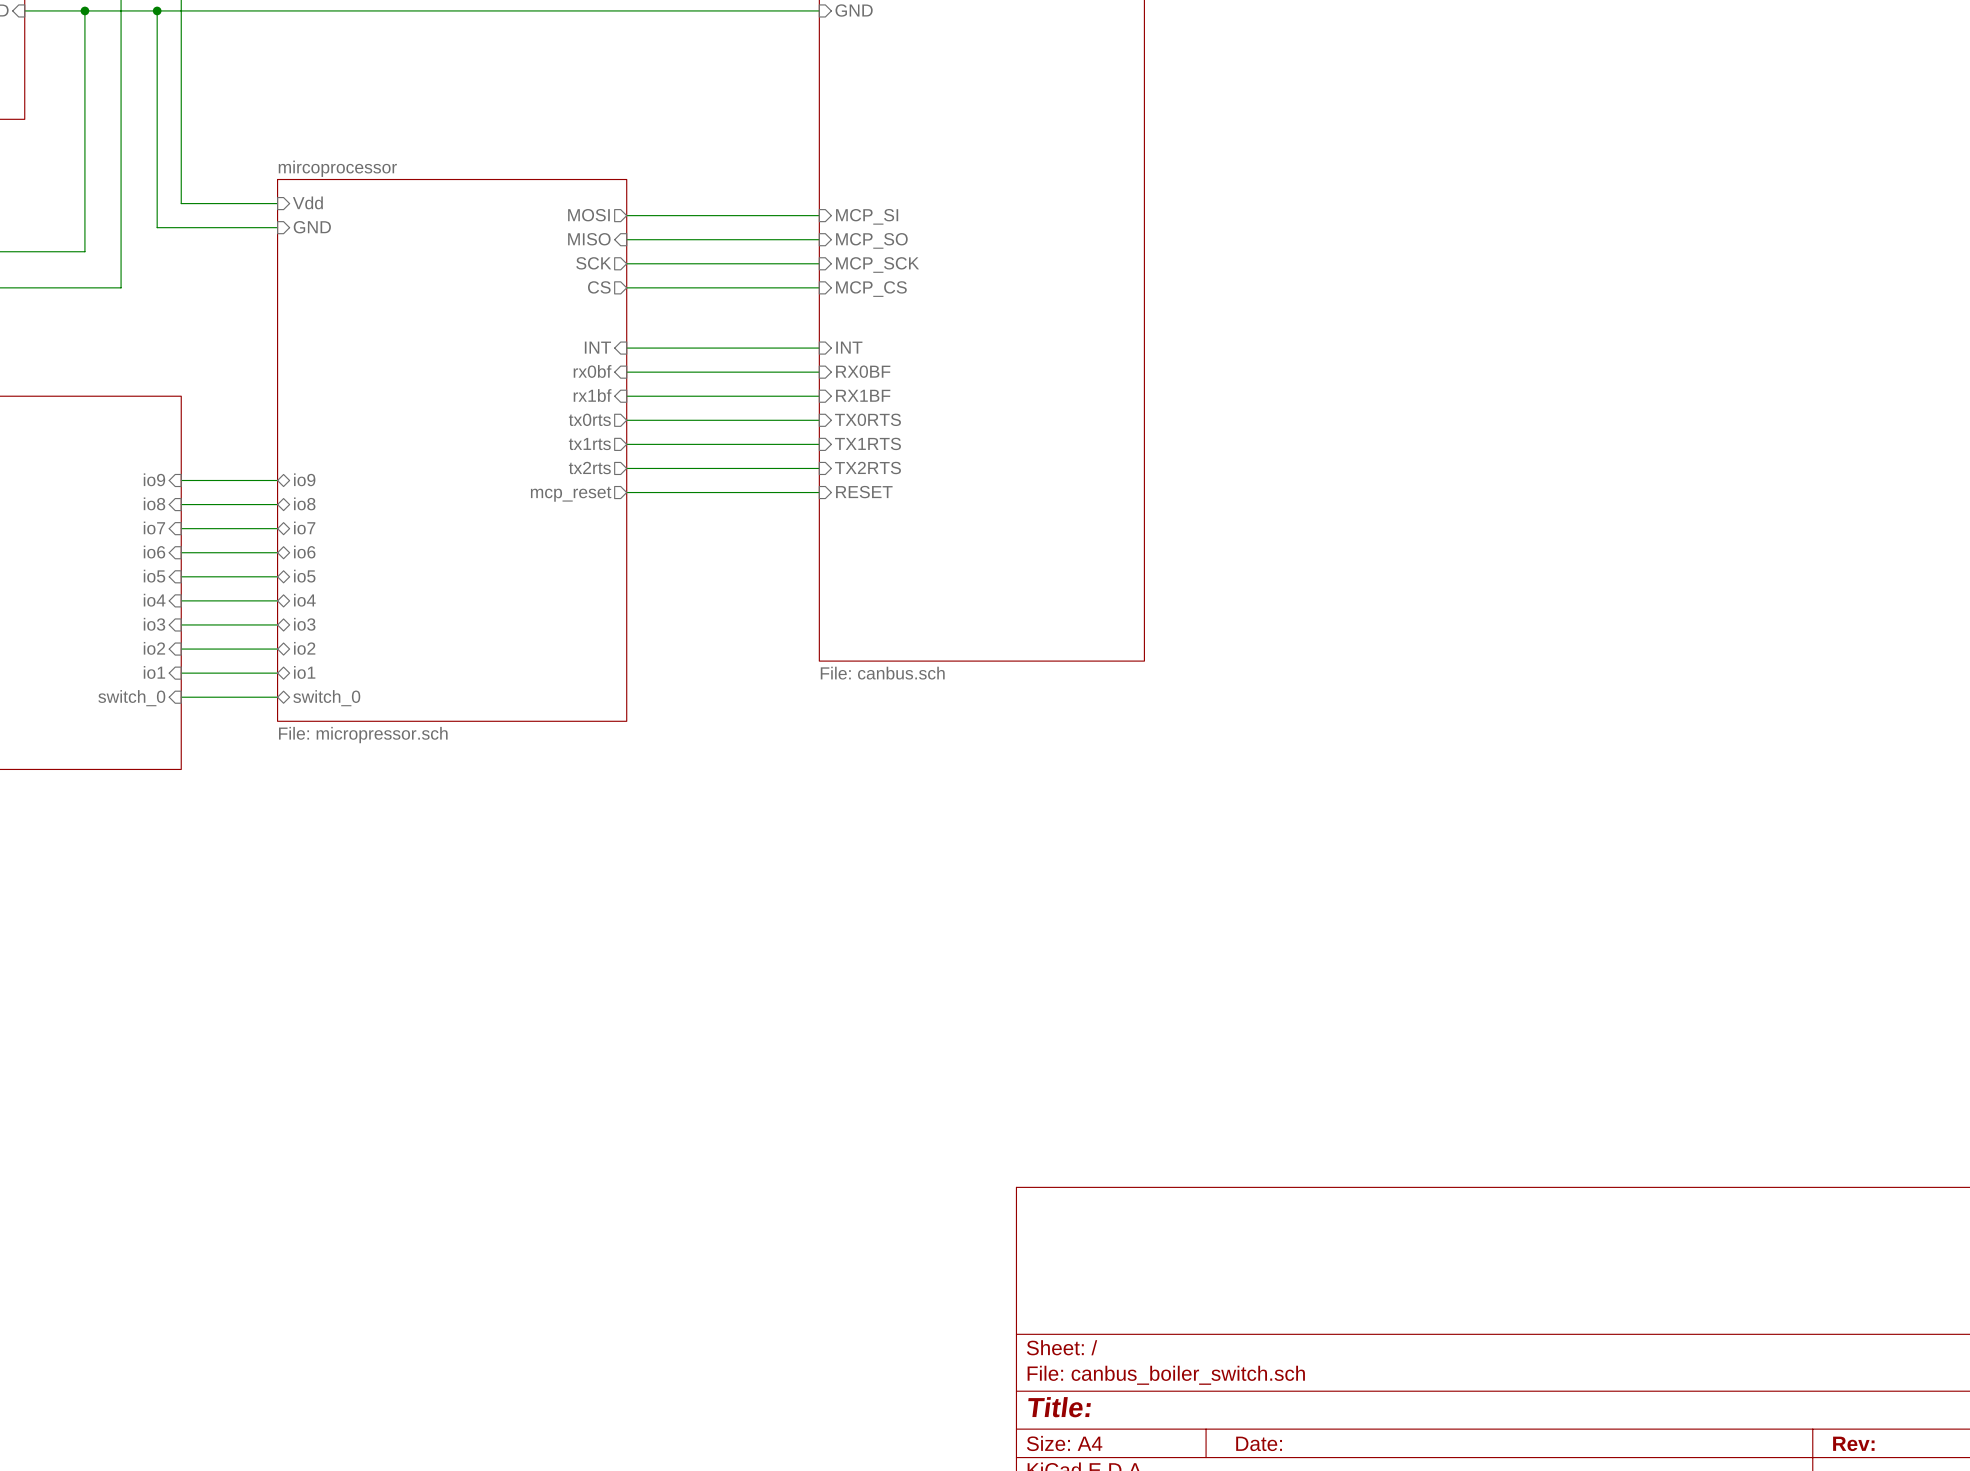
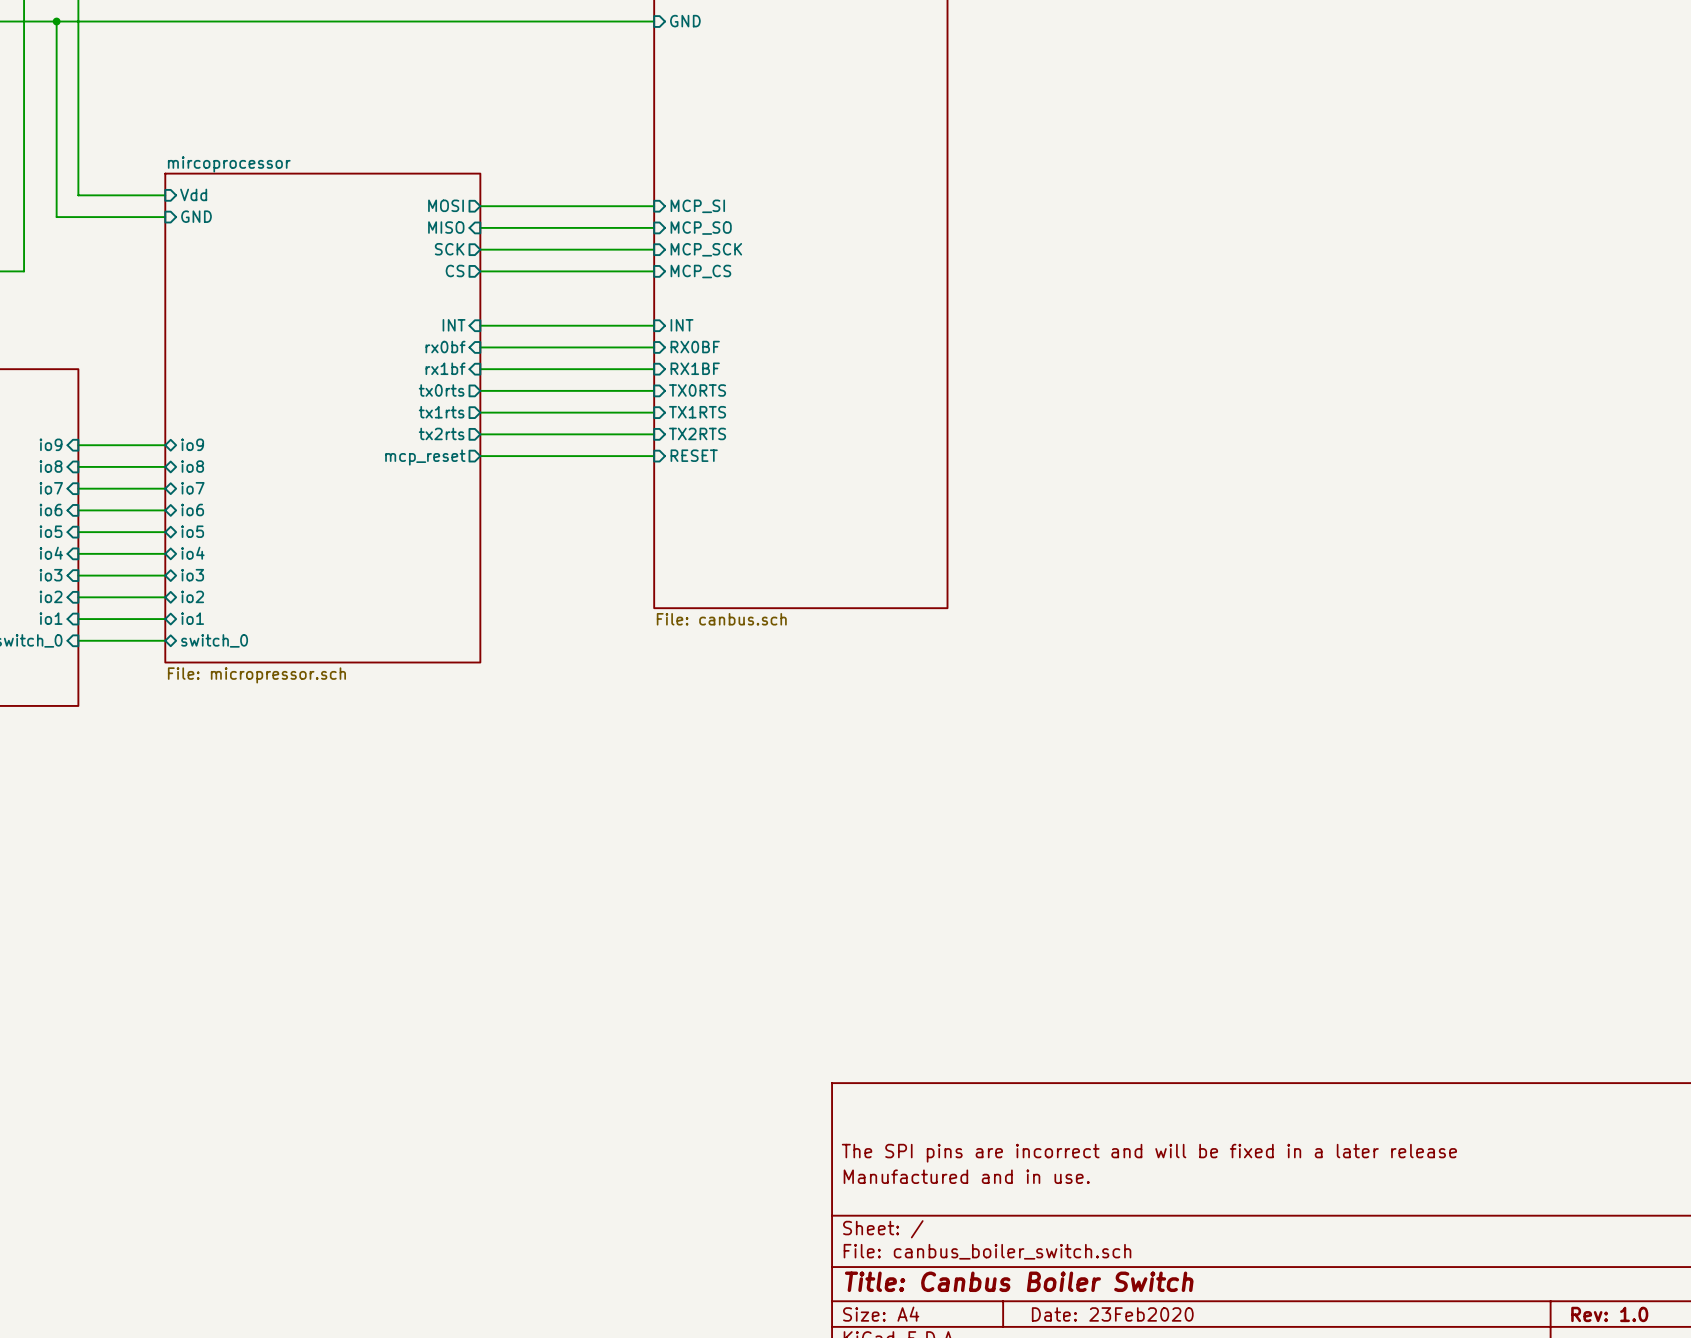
title block: none -> The SPI pins are incorrect and will be fixed in a later release (1149, 1153)
title block: none -> Manufactured and in use. (966, 1176)
title block: Title: (1059, 1407) -> Title: Canbus Boiler Switch (1019, 1281)
title block: Date: (1259, 1443) -> Date: 23Feb2020 (1112, 1314)
title block: Rev: (1853, 1443) -> Rev: 1.0 (1609, 1314)

